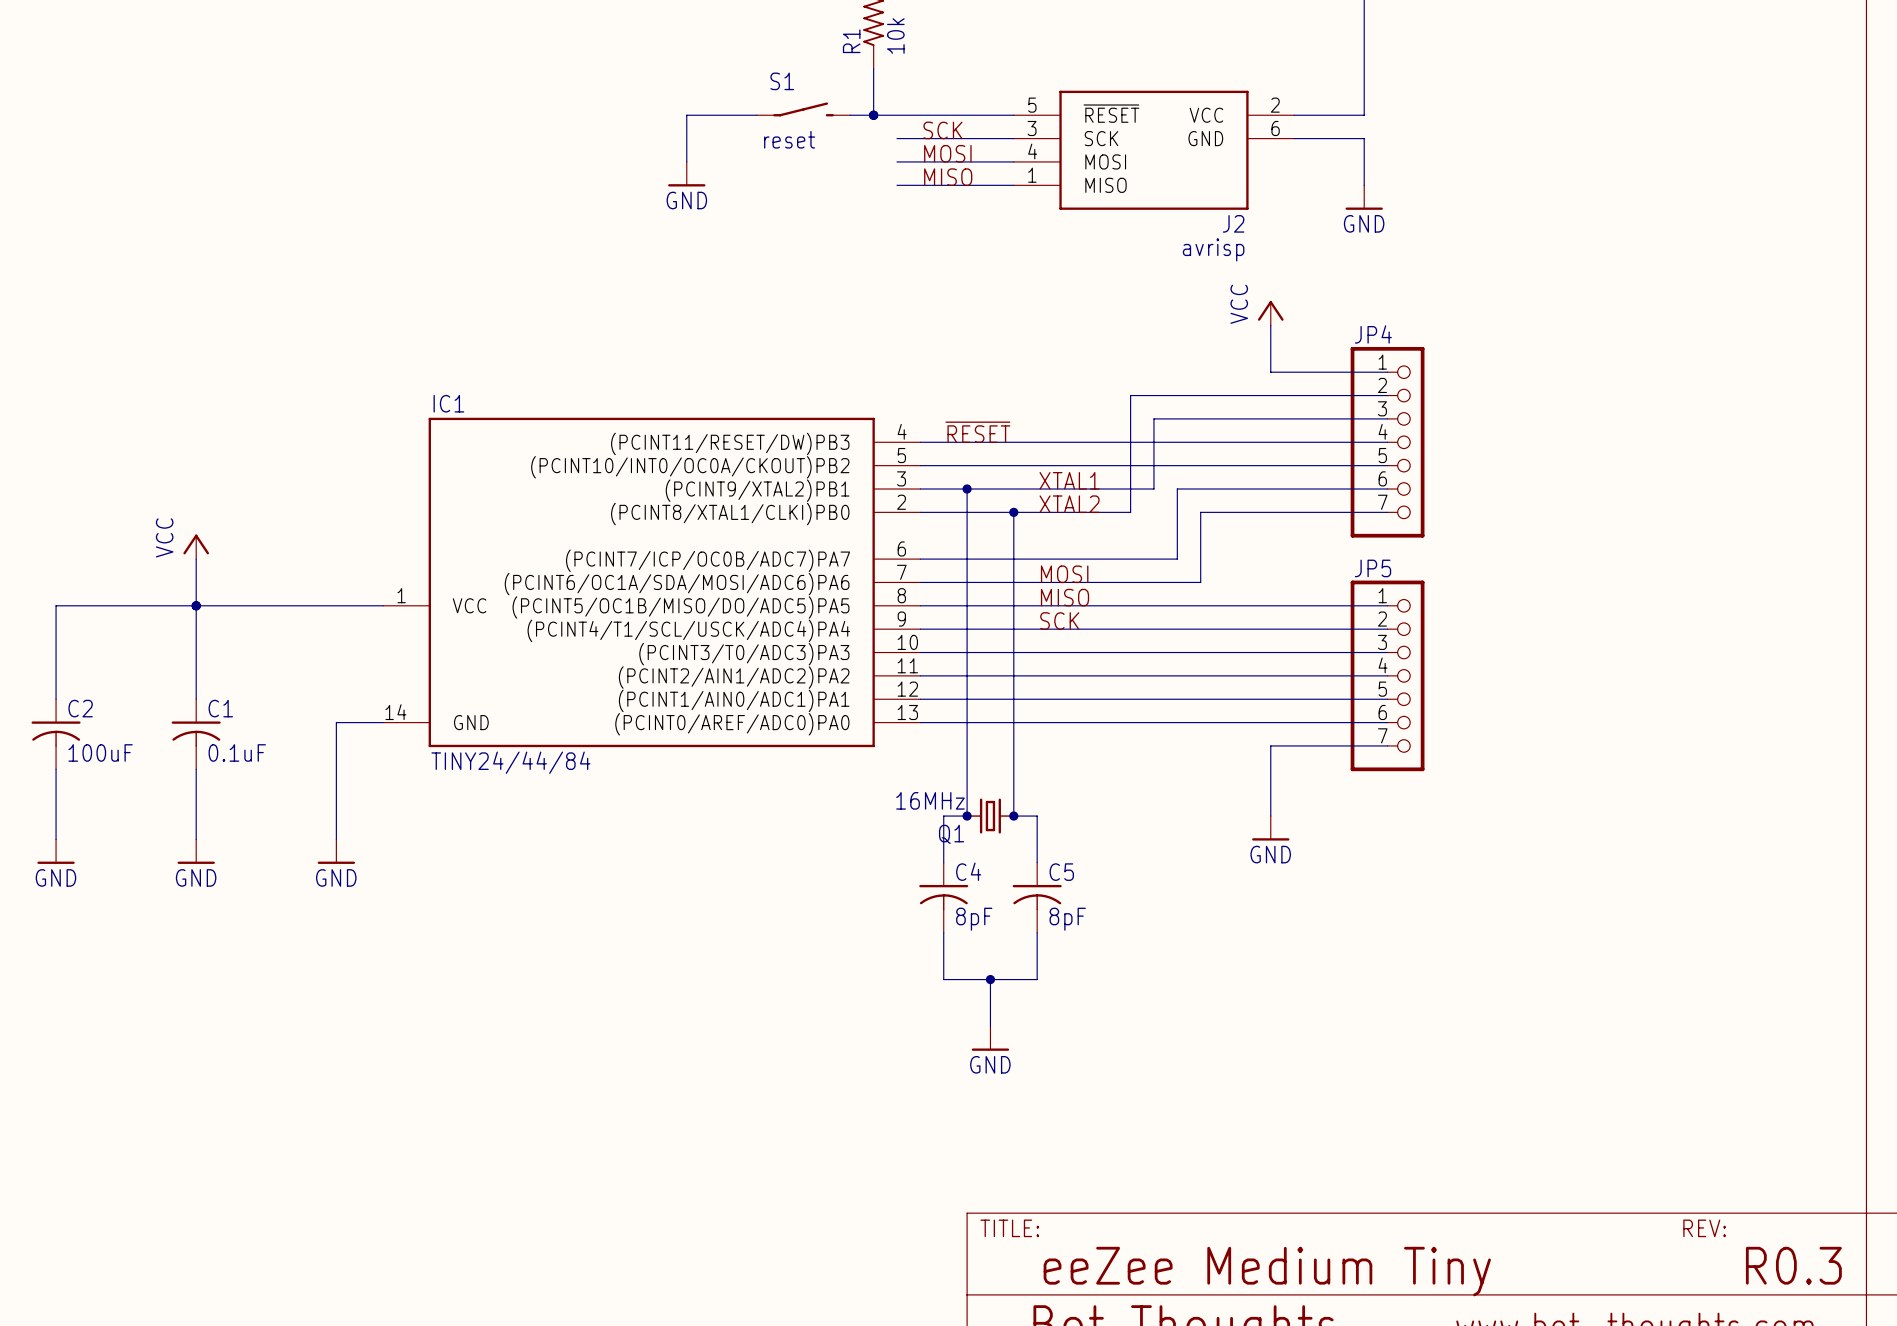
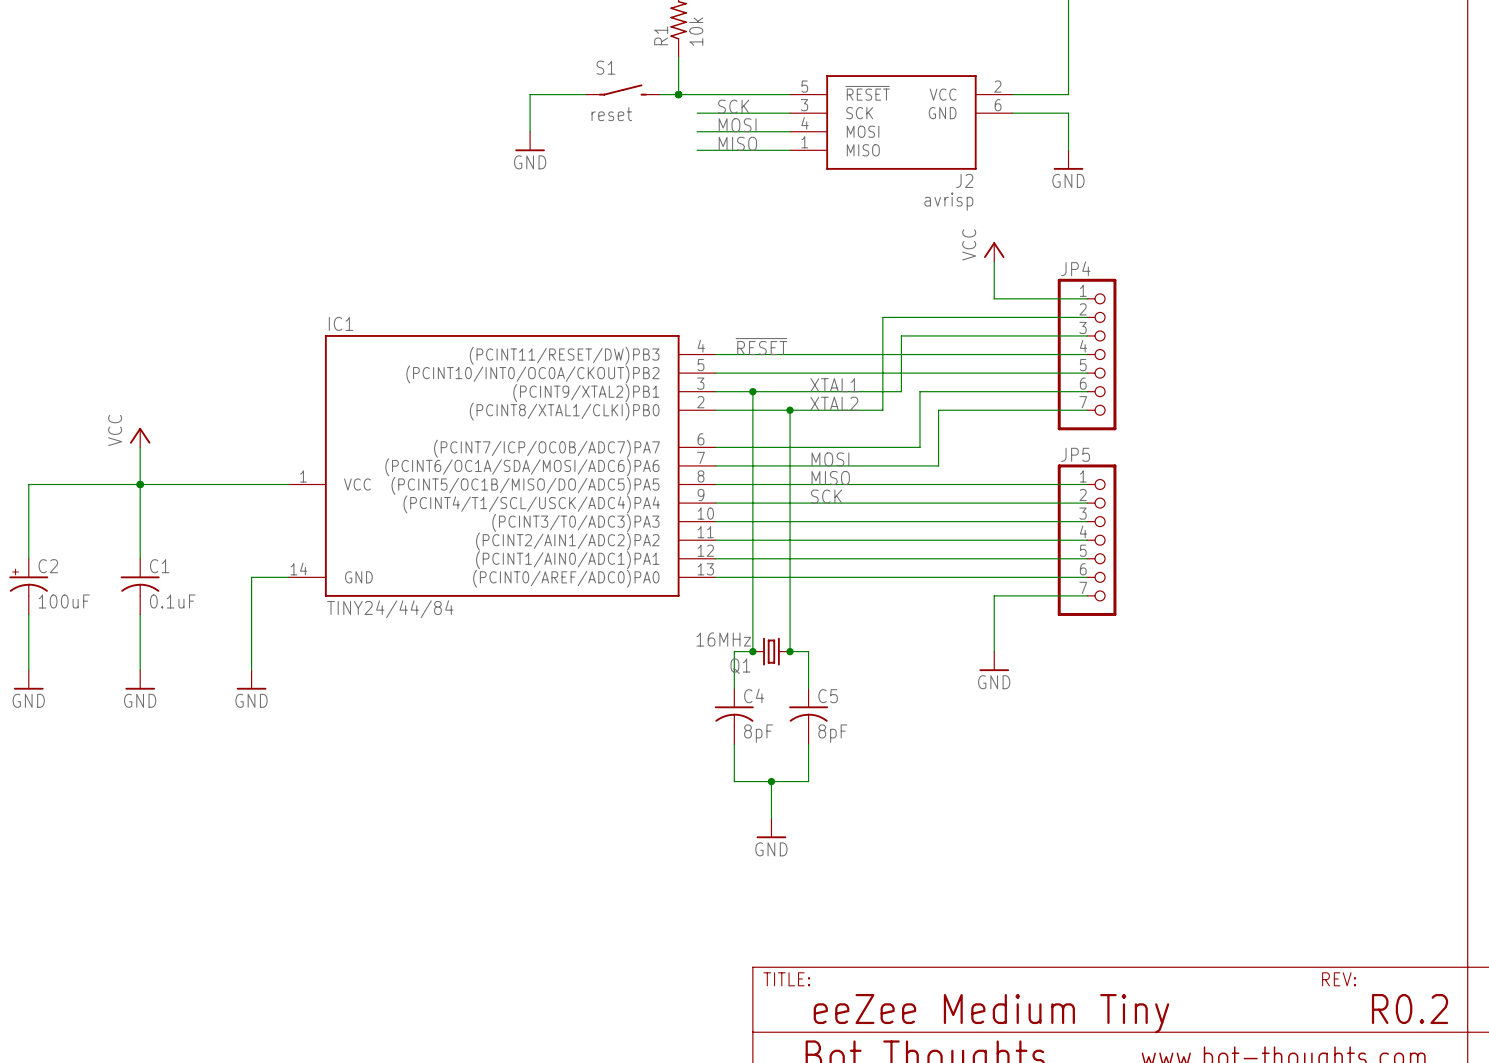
C2 symbol: [31, 699, 81, 770] -> [9, 558, 49, 615]
text: R0.3 (1793, 1265) -> R0.2 (1410, 1009)

